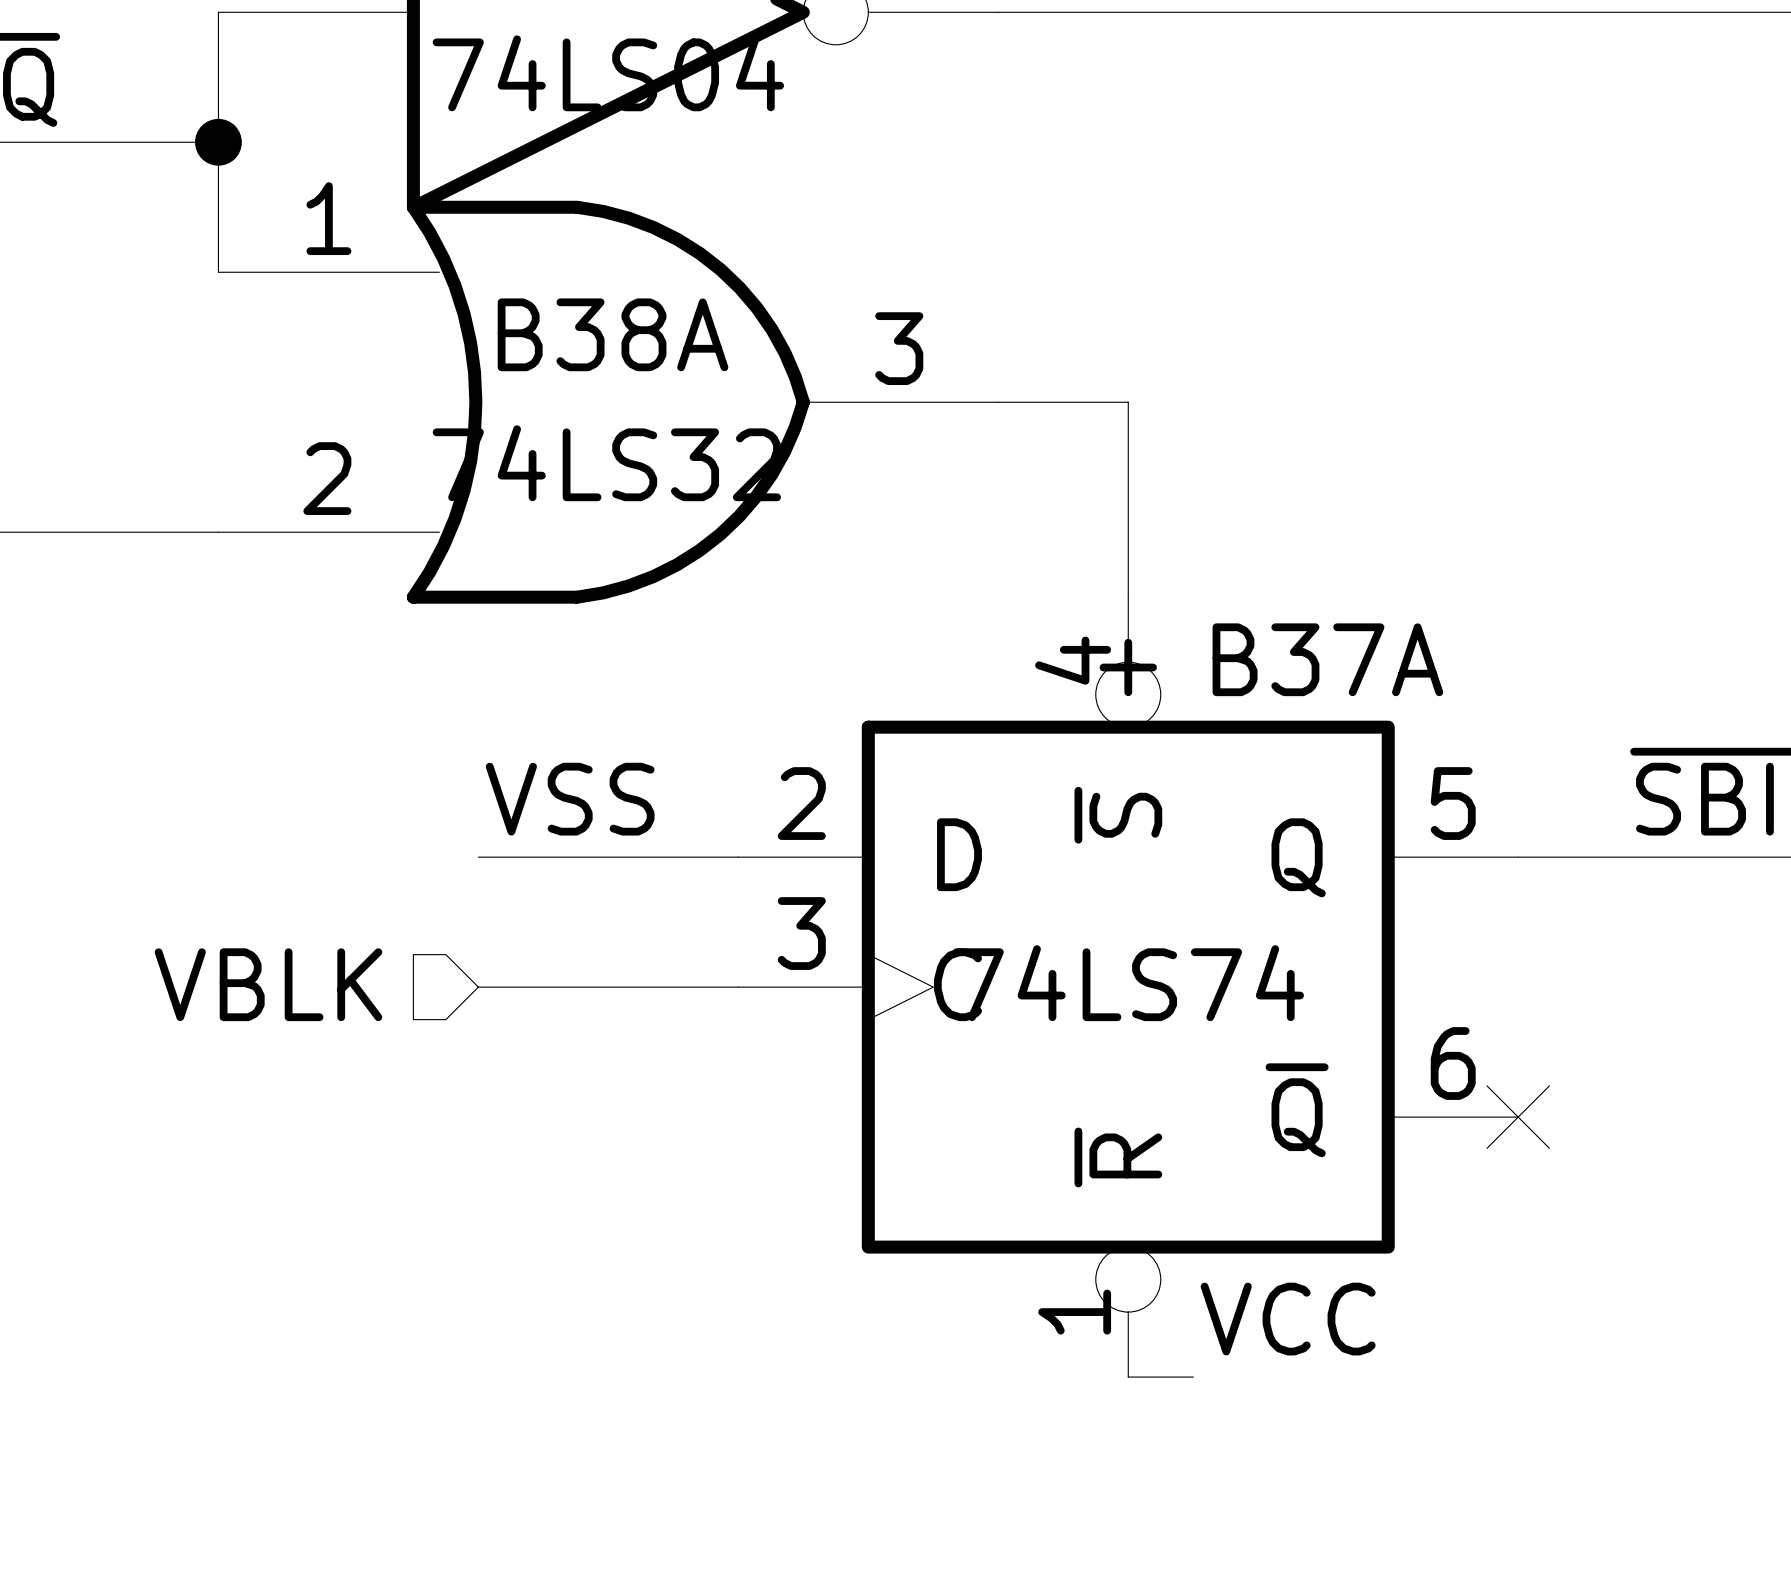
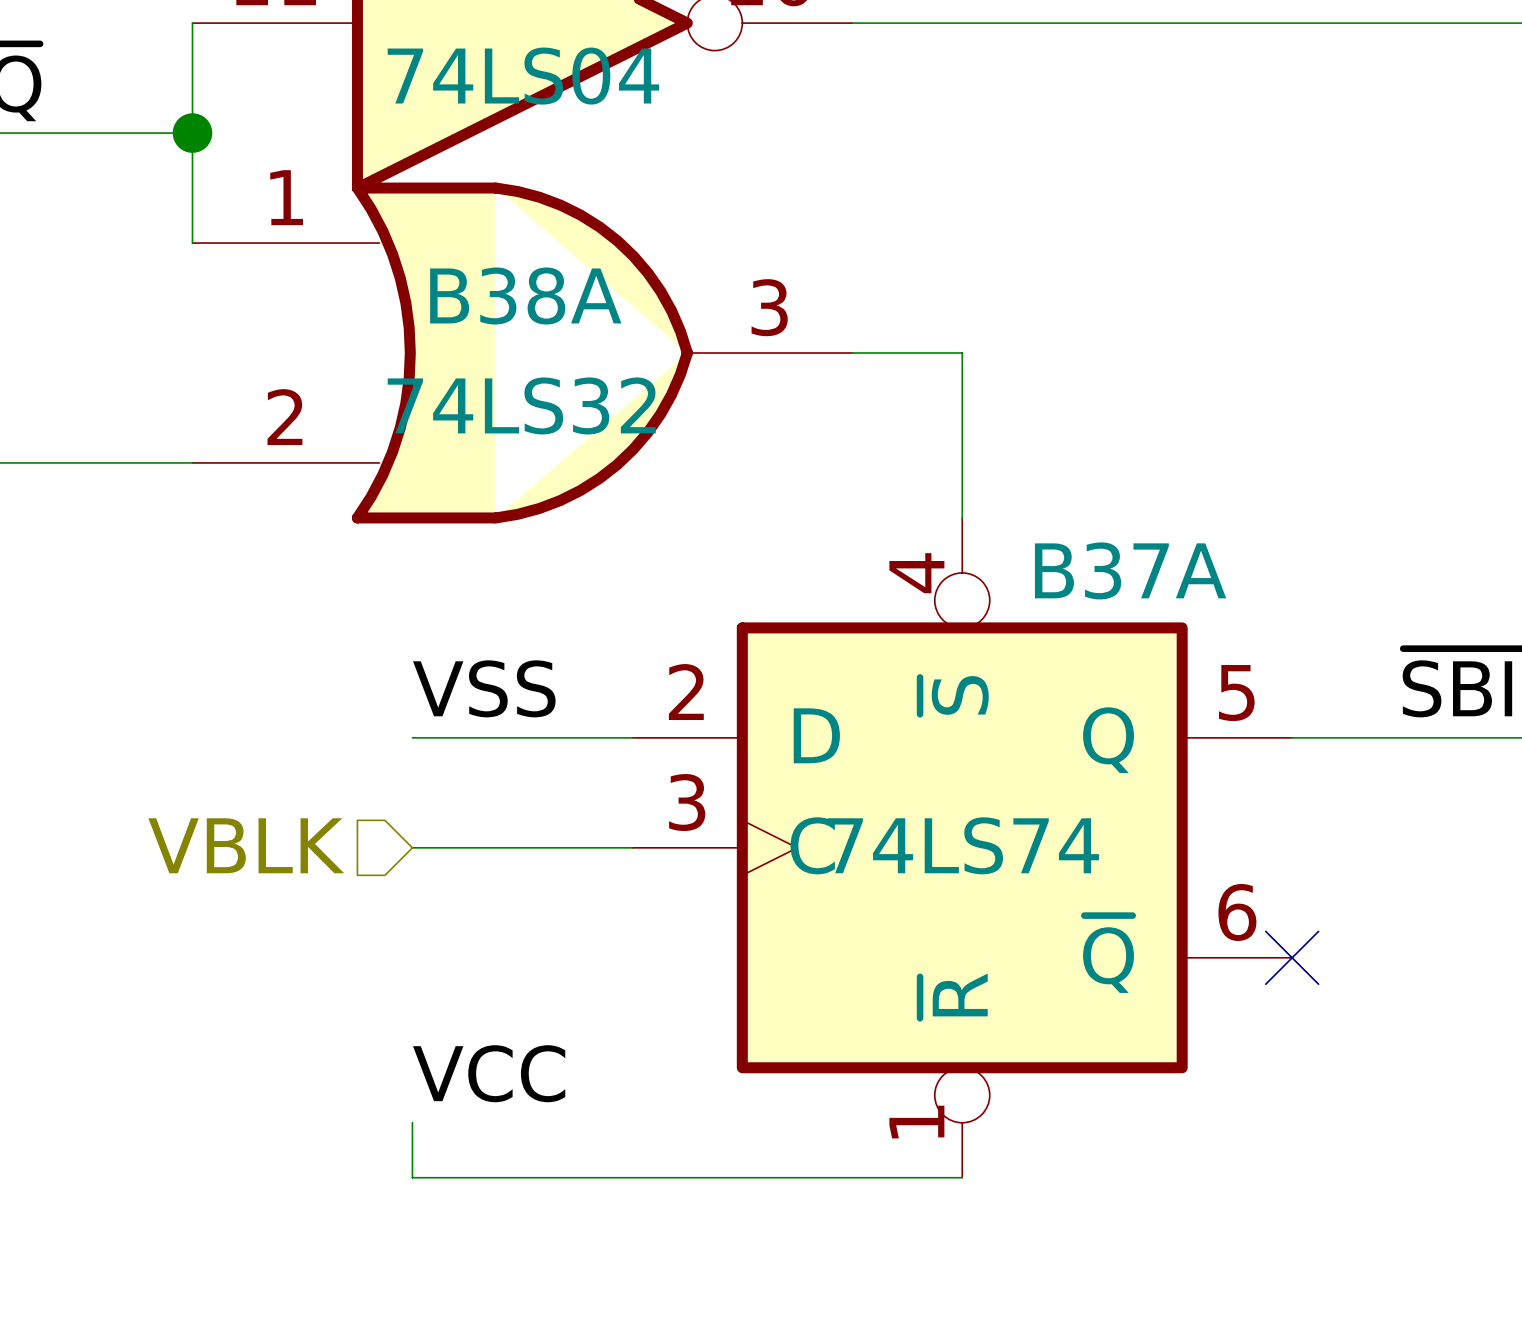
B37A text: + (1128, 667) -> none
label position: VCC (1288, 1319) -> VCC (489, 1073)
wire: (1128, 1377) (1193, 1377) -> (962, 1177) (412, 1177) (412, 1122)

